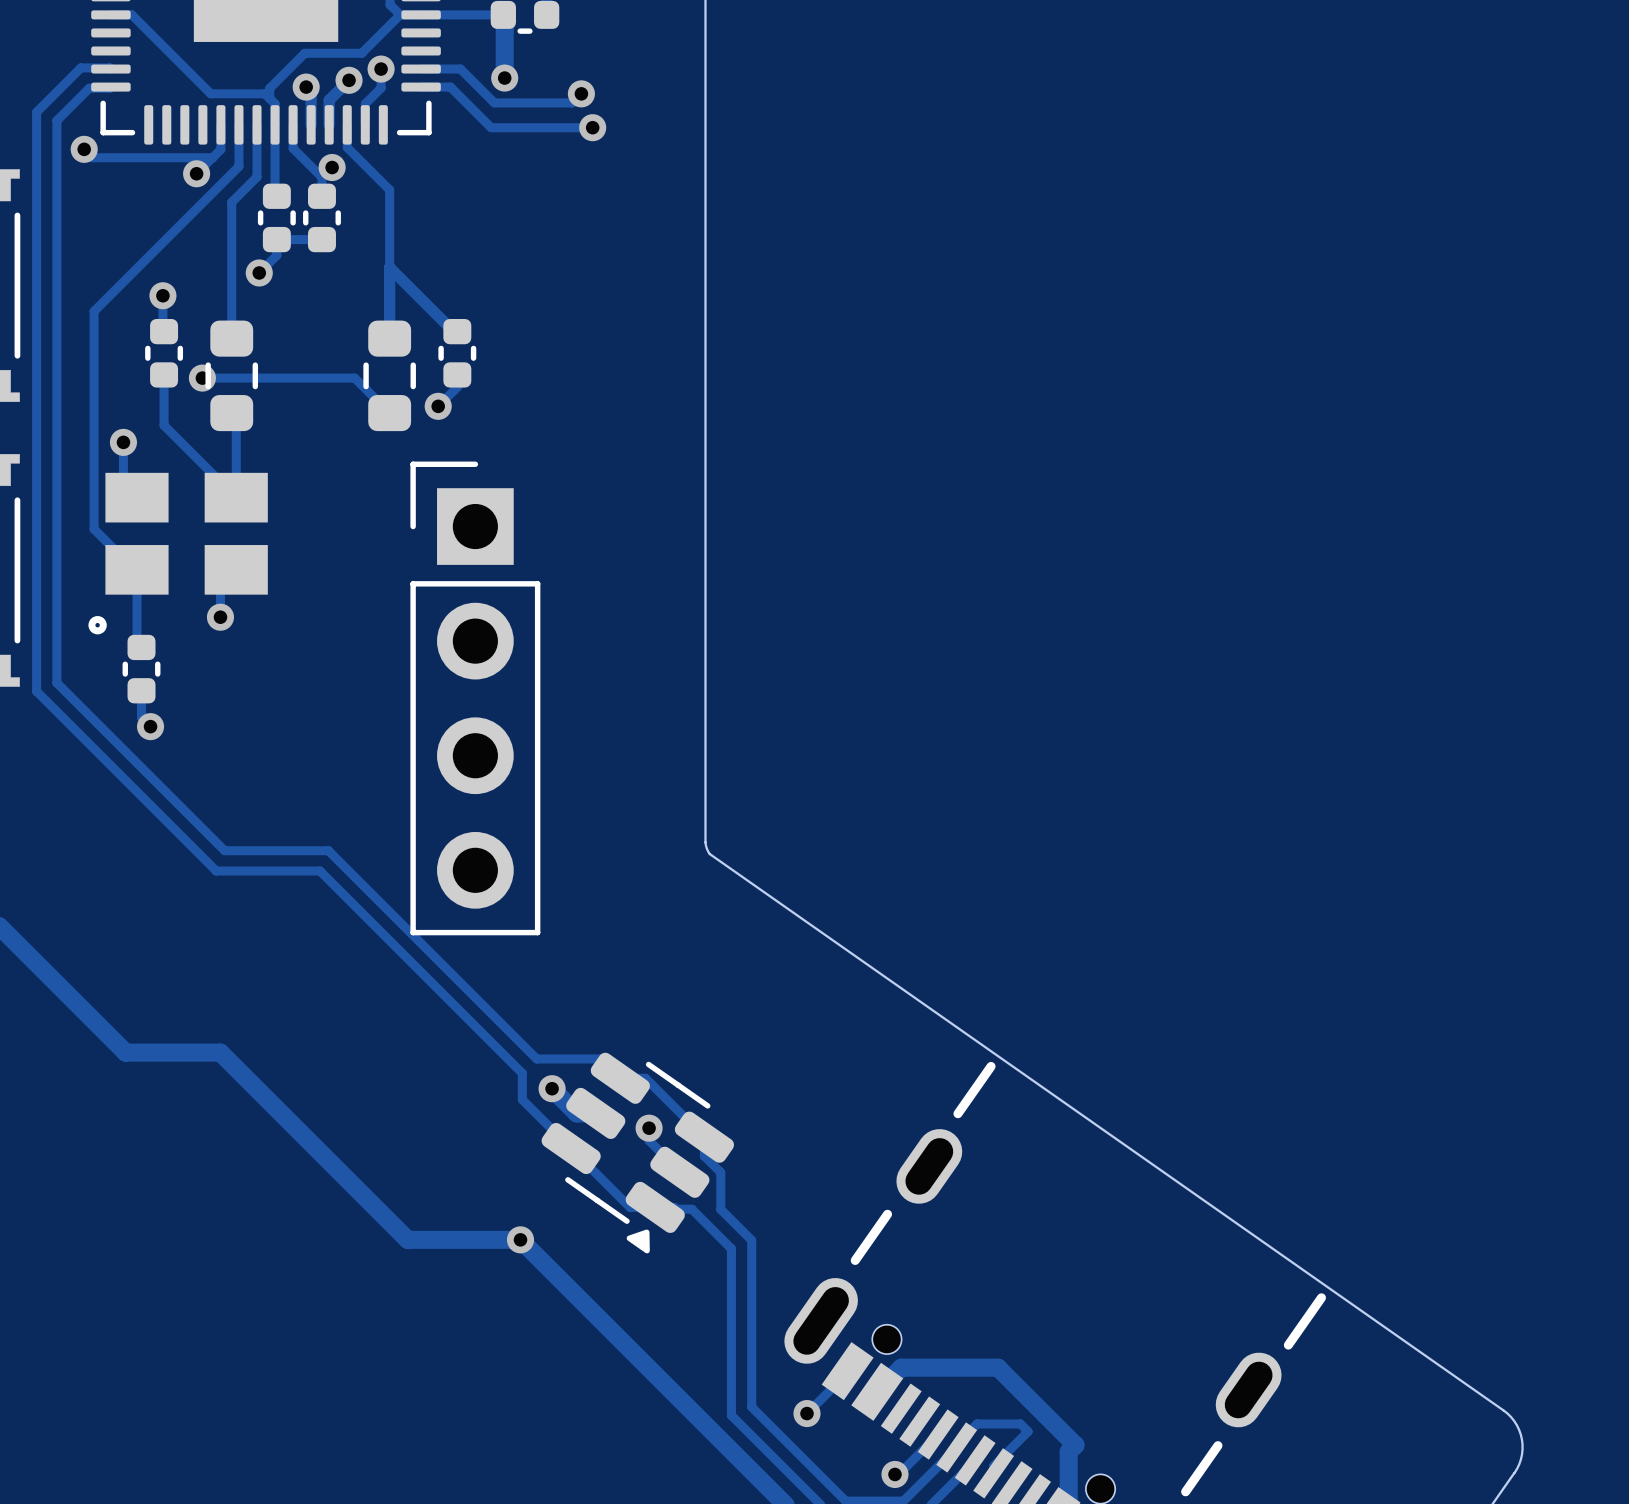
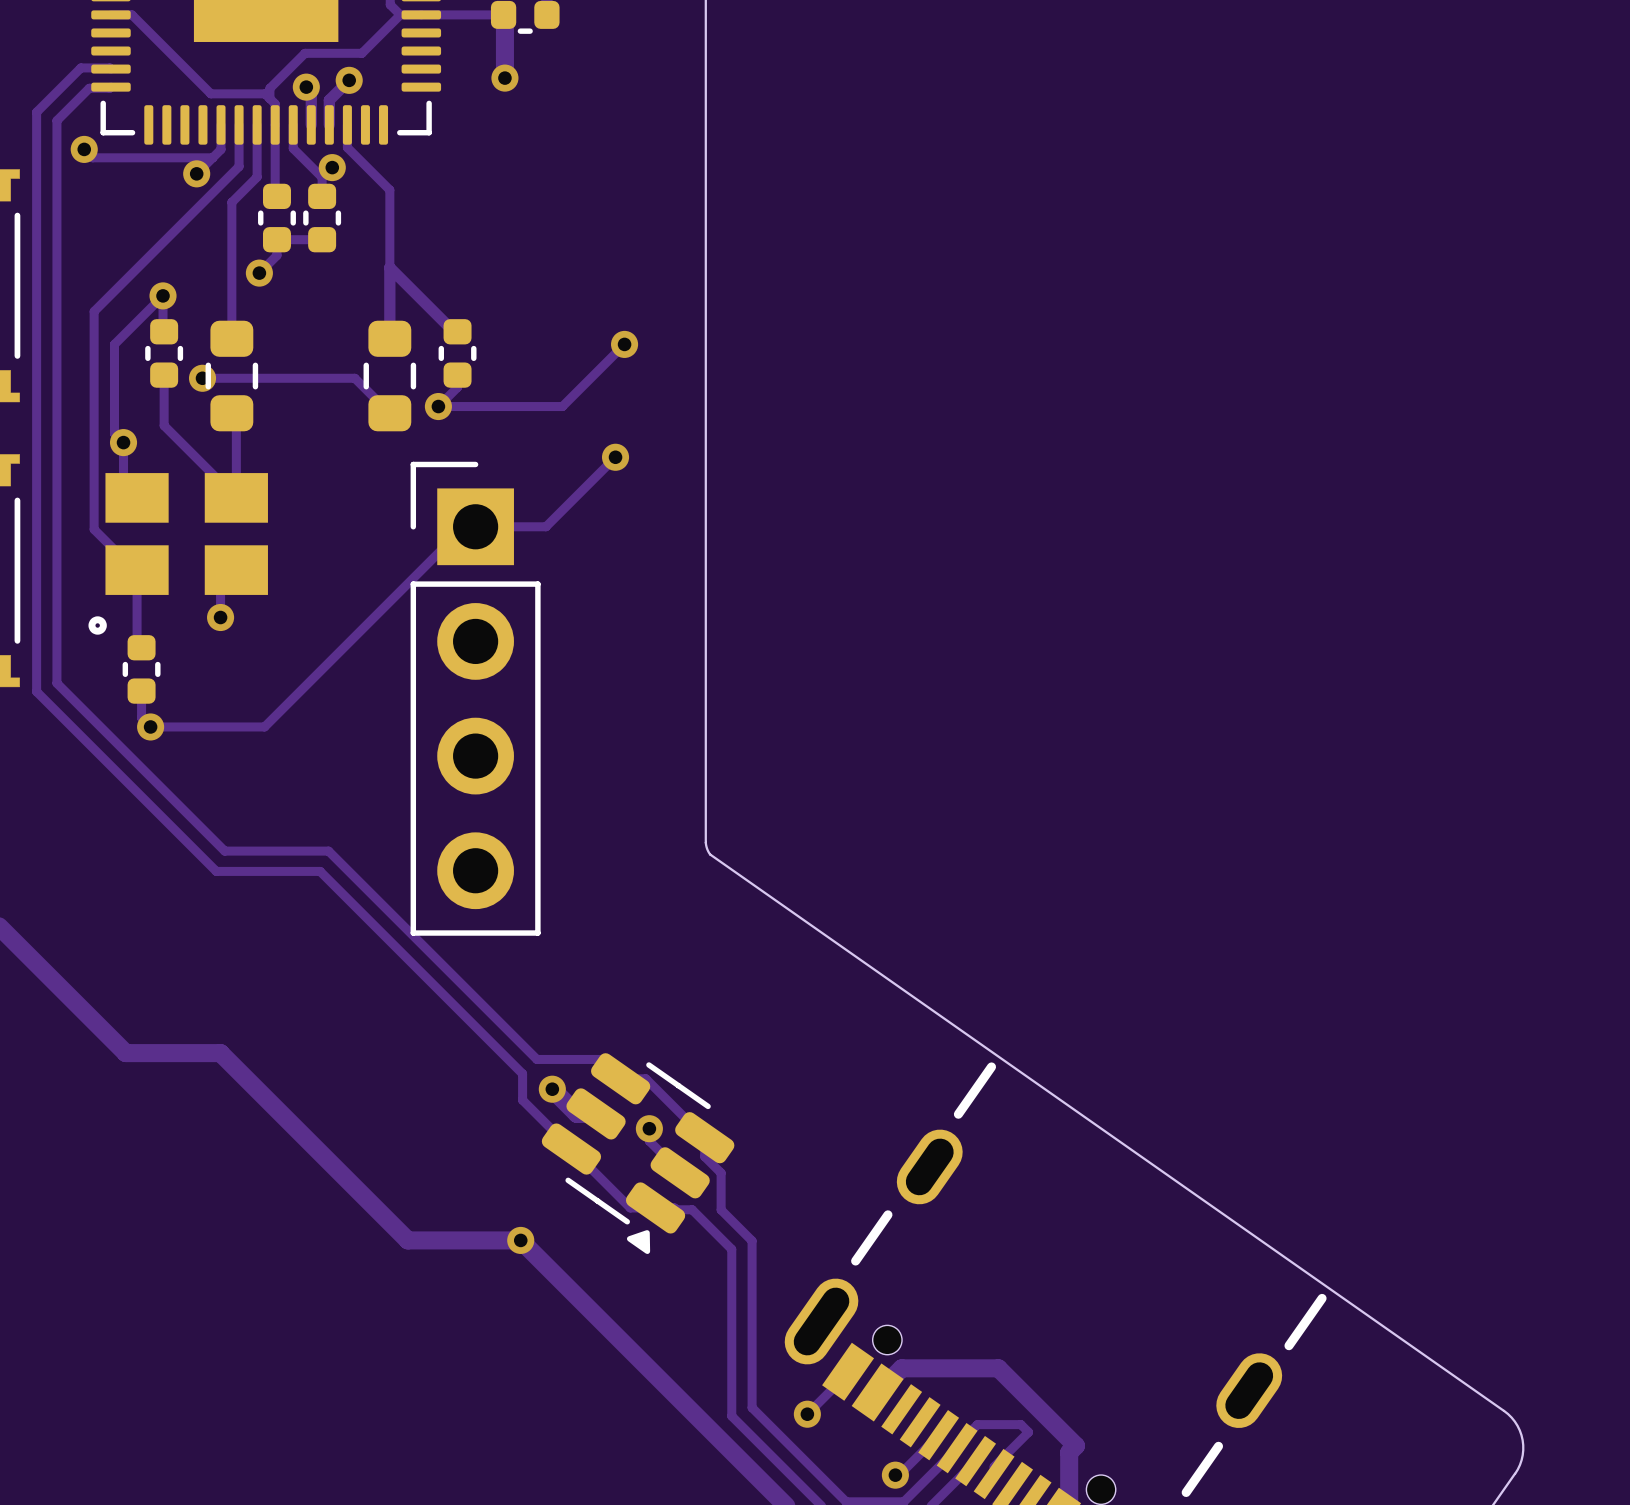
track: (381, 69) (381, 88) (365, 103) (365, 124) -> none
via: (381, 69) -> none
track: (421, 69) (460, 69) (494, 102) (572, 102) (581, 93) -> none
track: (421, 87) (450, 87) (491, 127) (592, 127) -> none
via: (581, 93) -> none
via: (592, 127) -> none
track: none -> (163, 295) (114, 344) (114, 433) (123, 442)
track: none -> (624, 344) (562, 406) (438, 406)
via: none -> (624, 344)
track: none -> (615, 457) (546, 526) (464, 526) (264, 726) (150, 726)
via: none -> (615, 457)

